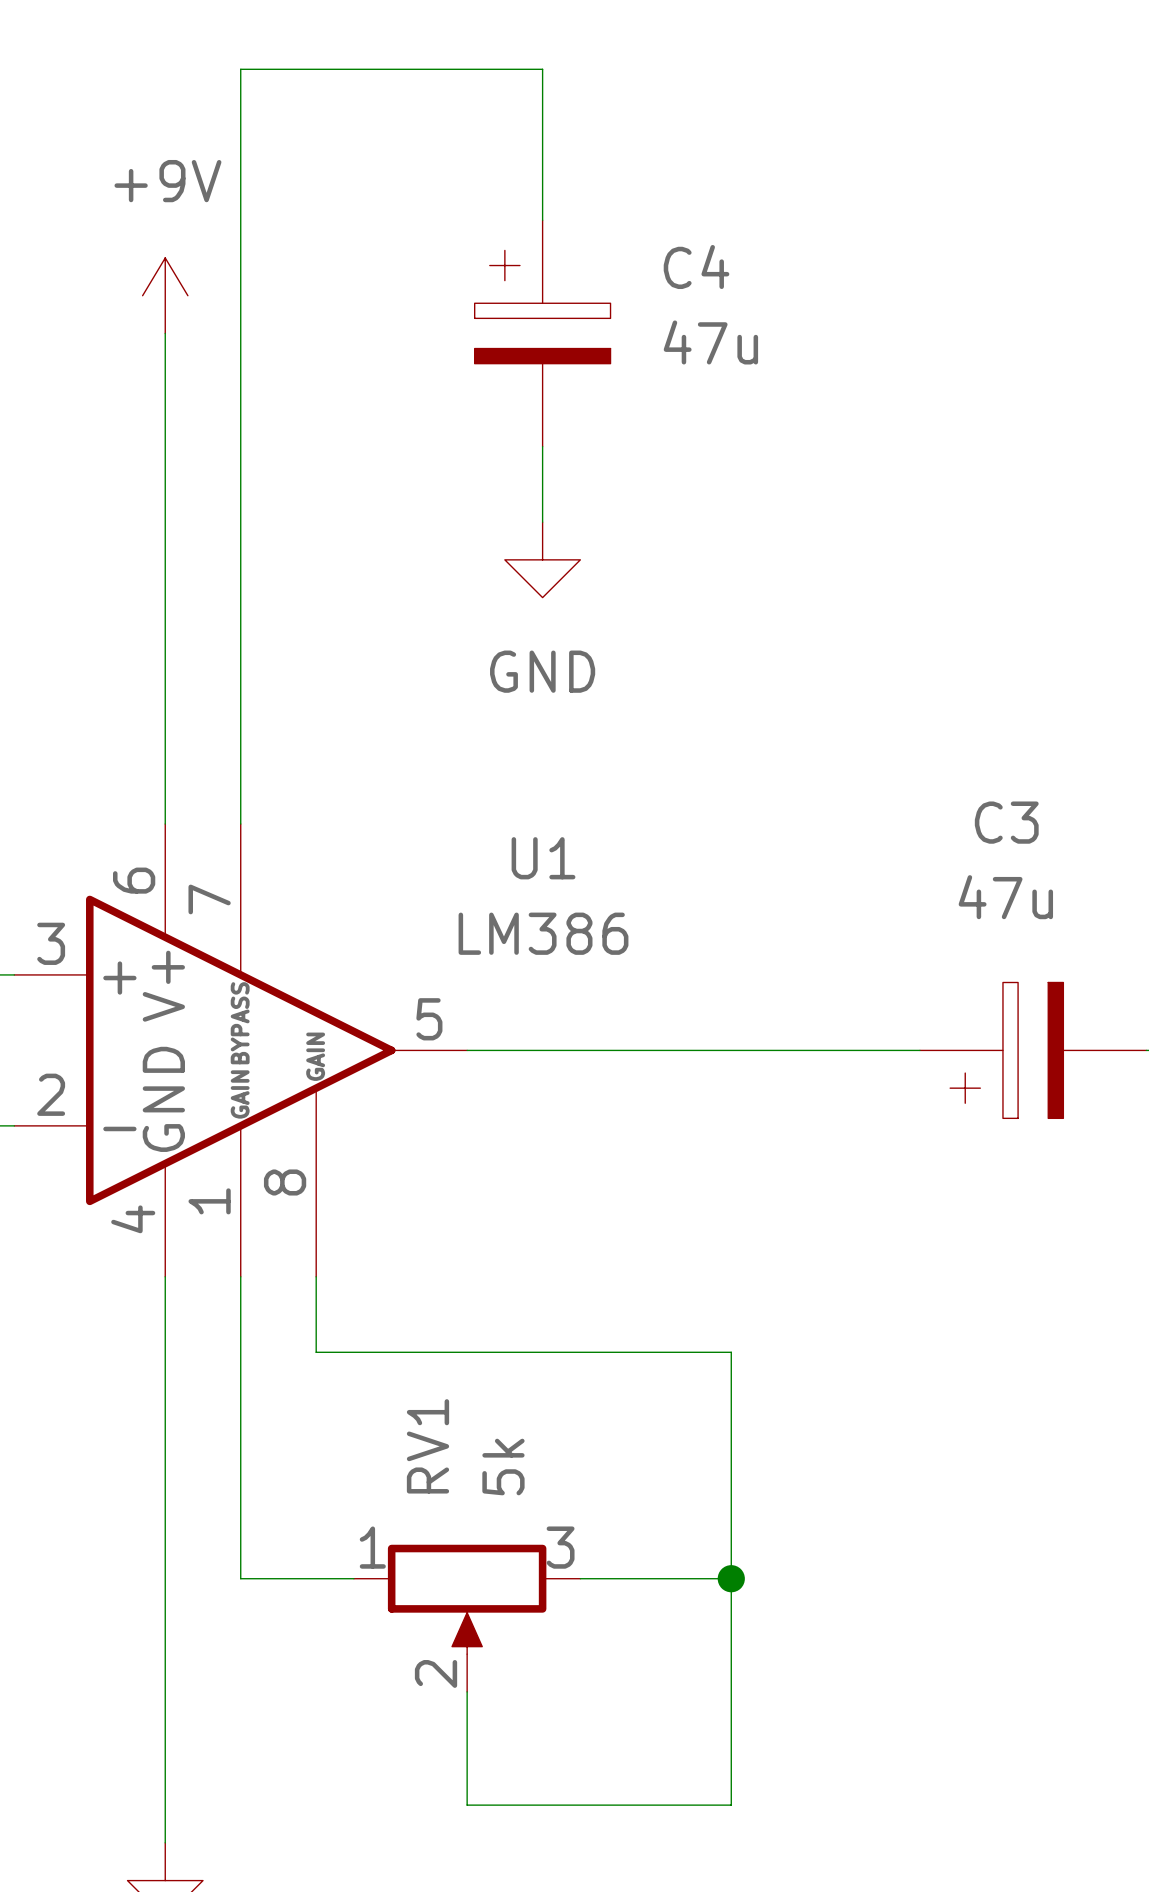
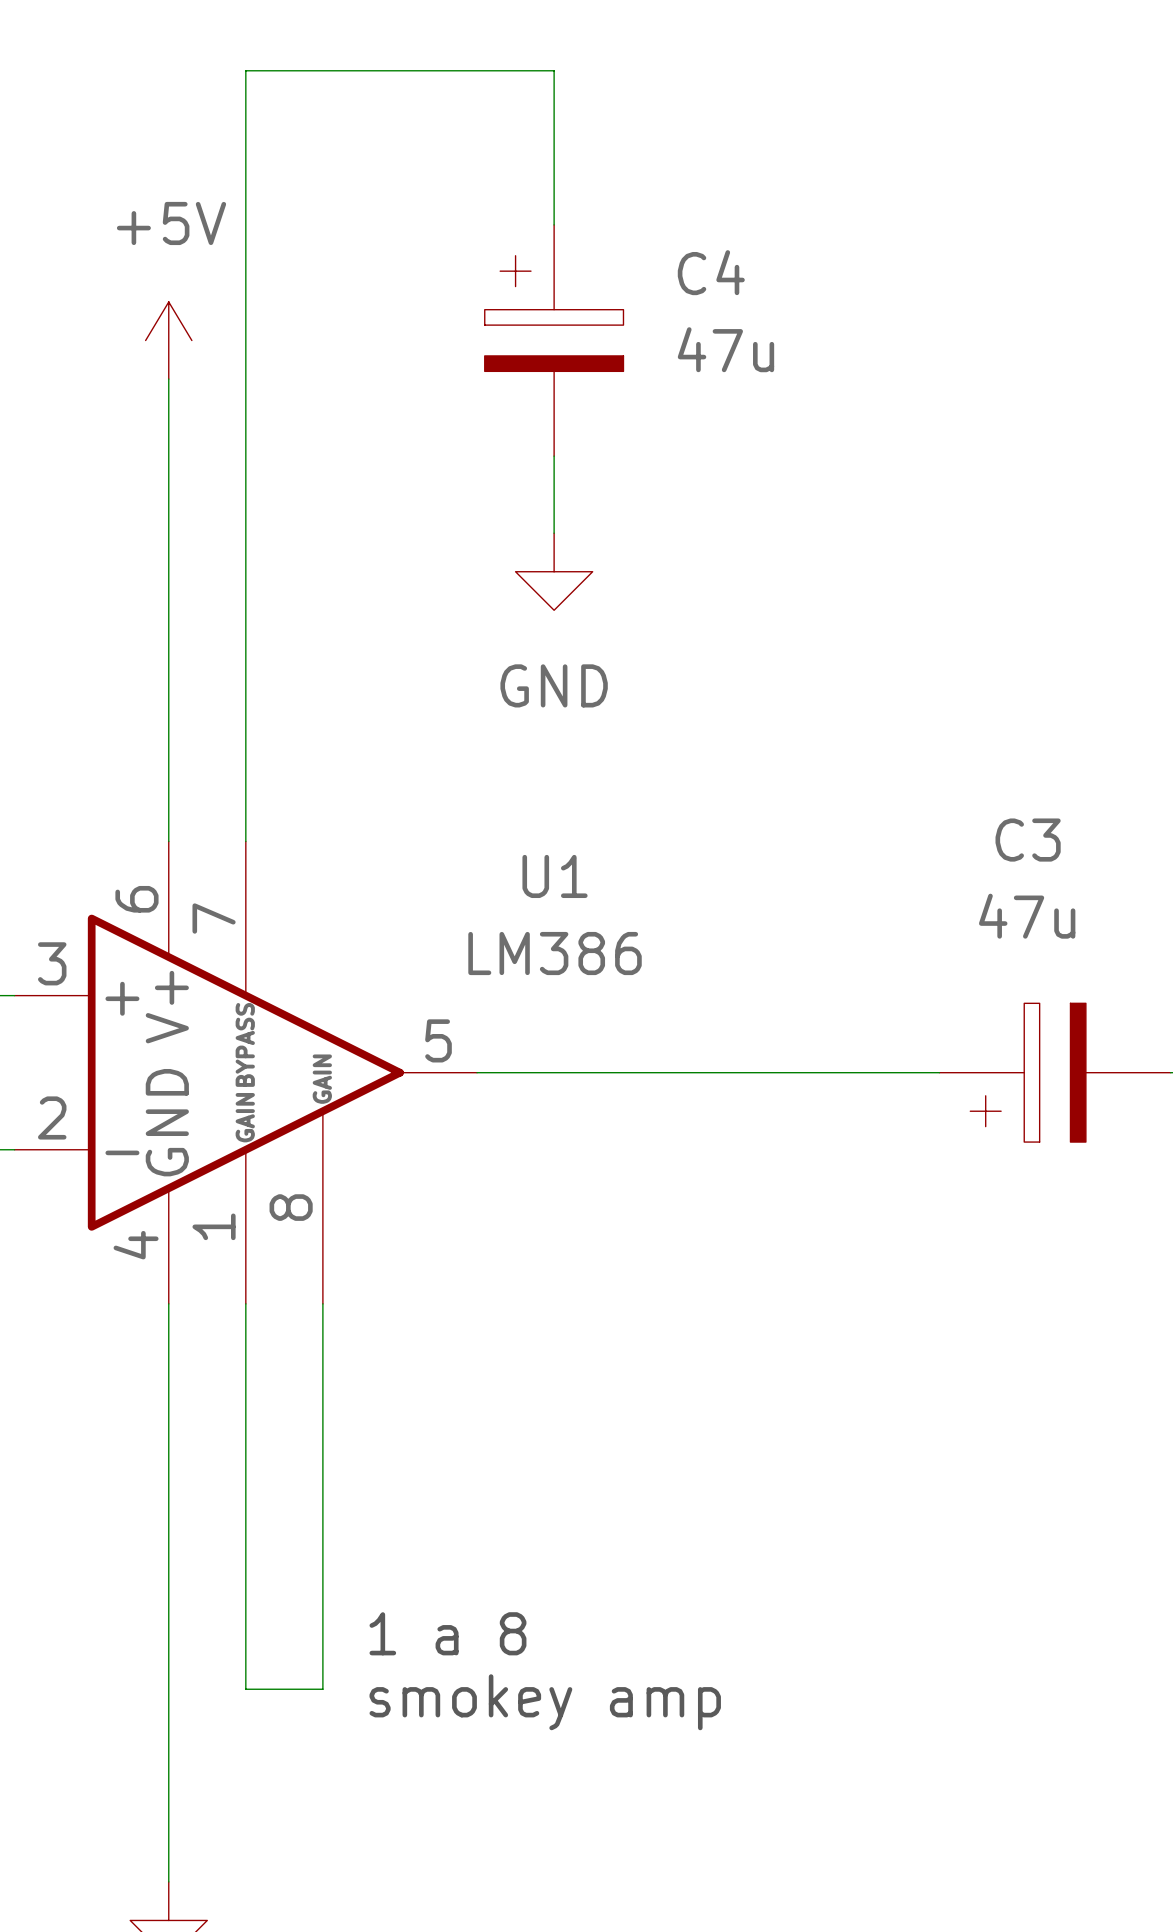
power symbol: +9V (165, 295) -> none
power symbol: none -> +5V (168, 340)
wire: (316, 1352) (731, 1352) (731, 1805) (467, 1805) (467, 1691) -> none
wire: (240, 1578) (353, 1578) -> (245, 1612) (245, 1689) (322, 1689) (322, 1380)
wire: (580, 1578) (731, 1578) -> none
junction: (731, 1578) -> none
text: none -> 1 a 8 (447, 1633)
RV1: 5k (467, 1618) -> none
text: none -> smokey amp (545, 1702)

